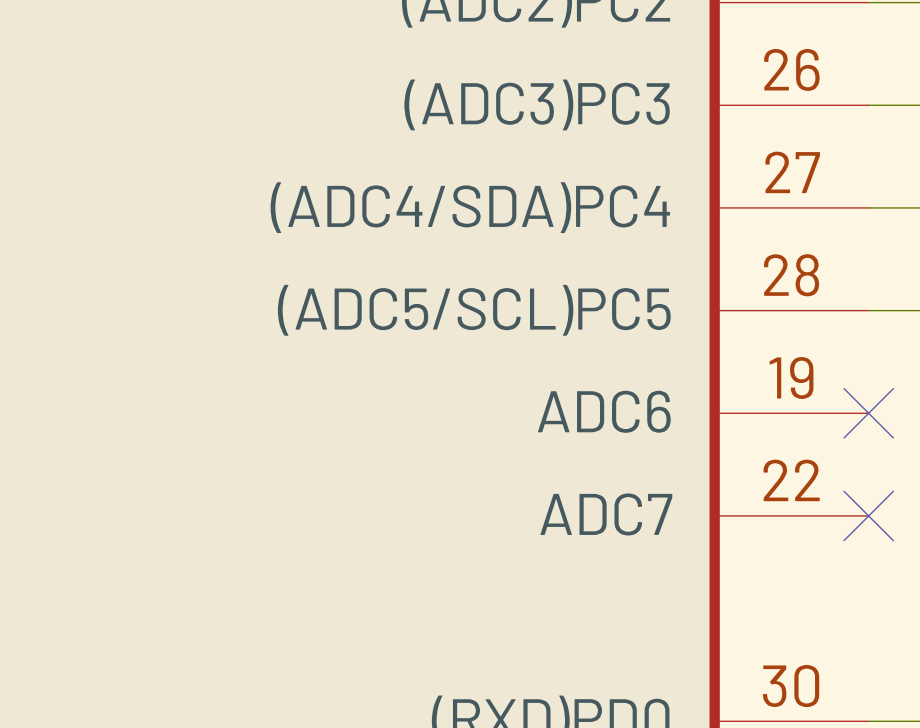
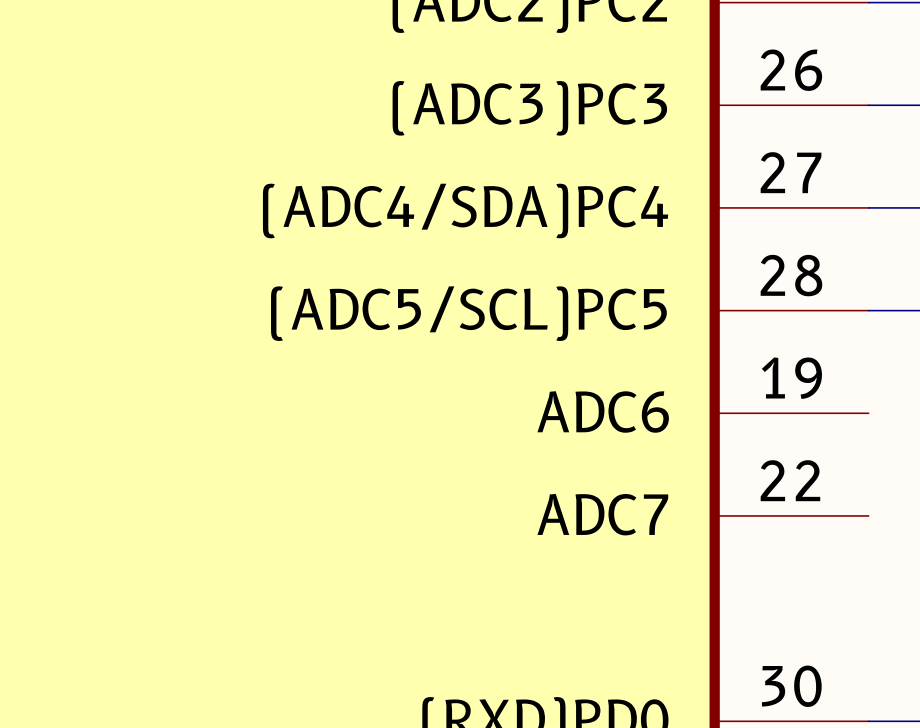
no-connect mark: (868, 413) -> none
no-connect mark: (868, 515) -> none

